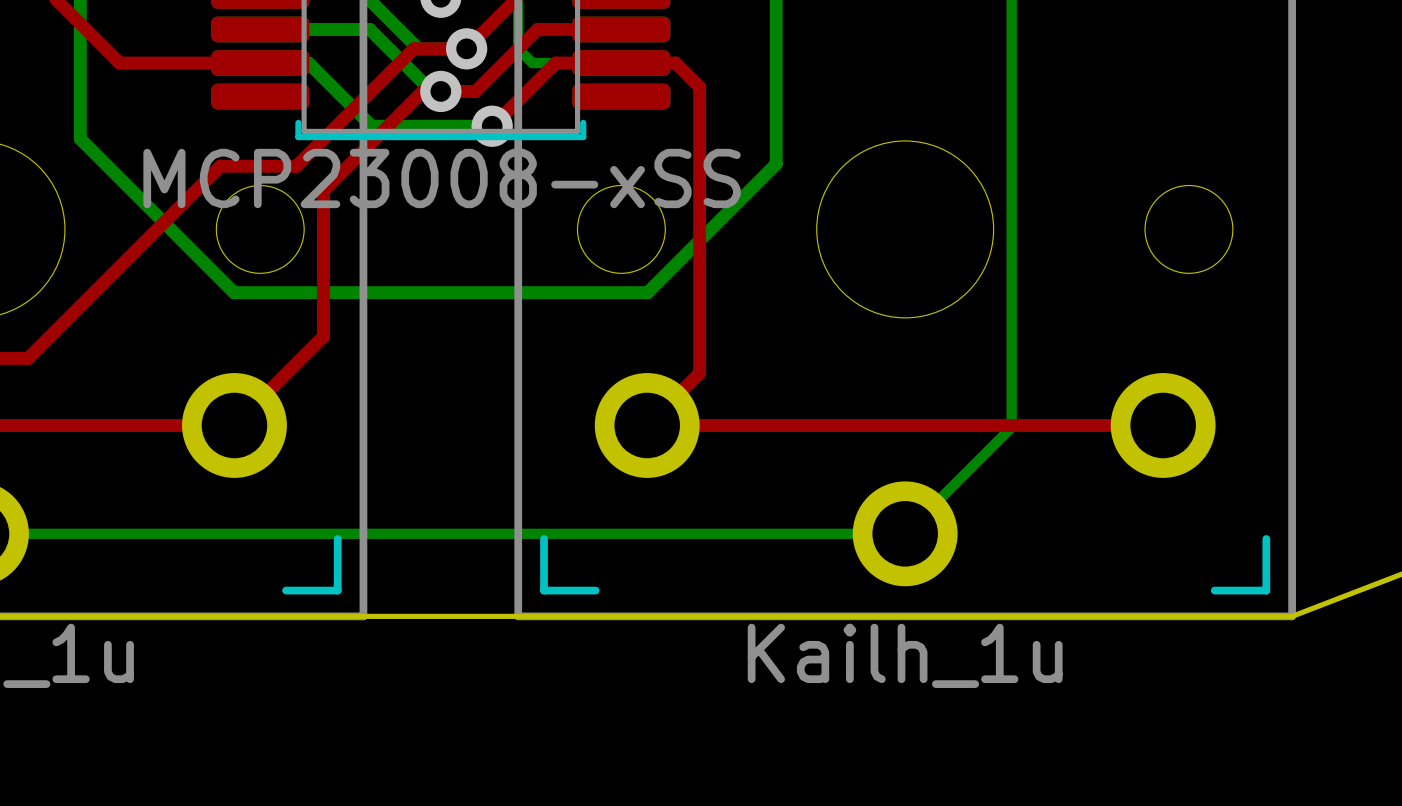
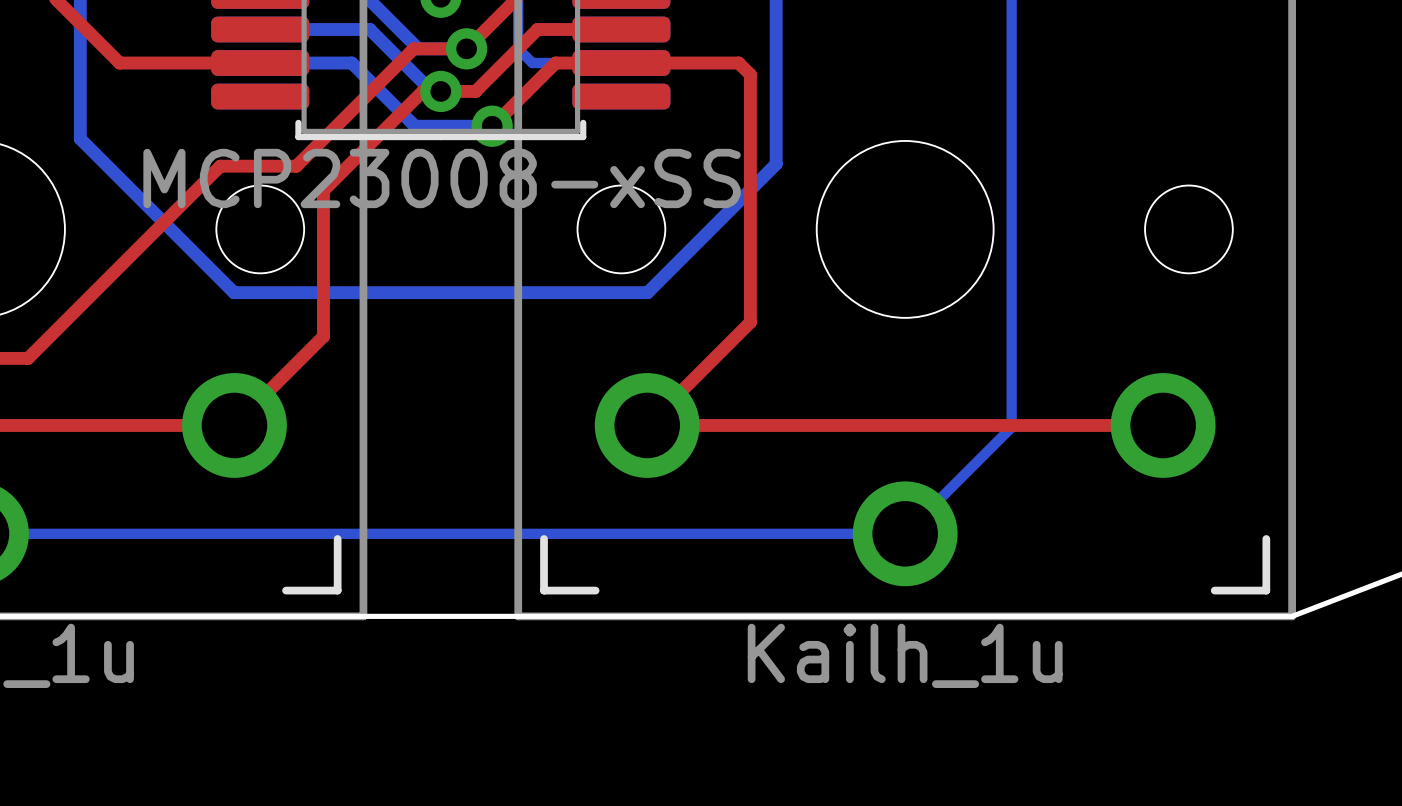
bottom track: (308, 63) (371, 126) (415, 126) -> (308, 63) (351, 63) (415, 126)
top track: (675, 63) (699, 87) (699, 373) -> (675, 63) (738, 63) (750, 74) (750, 322) (699, 373)

